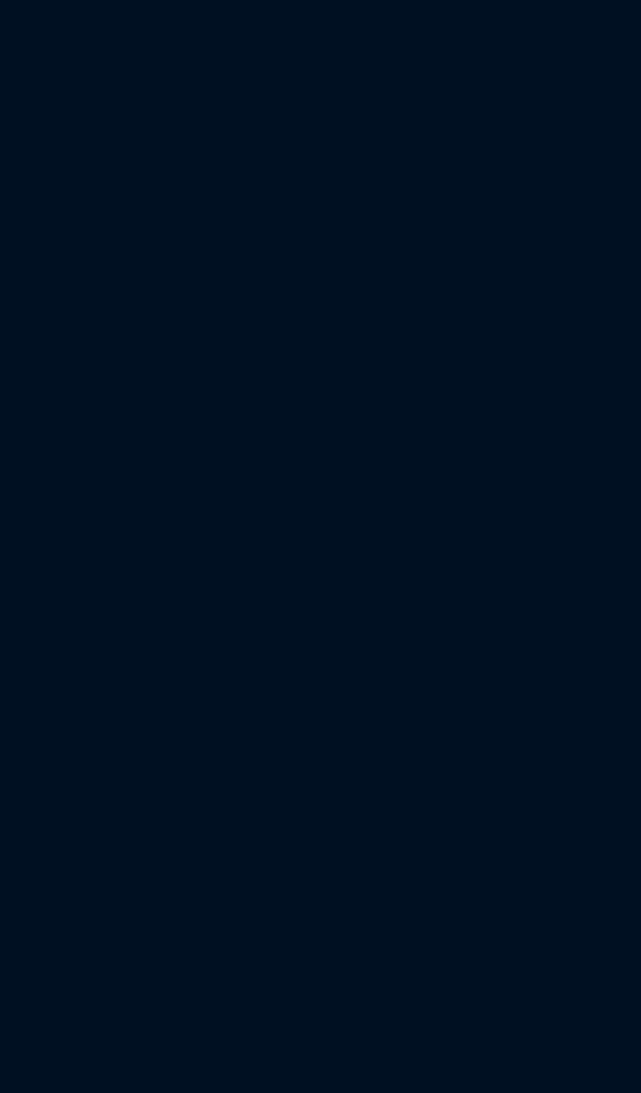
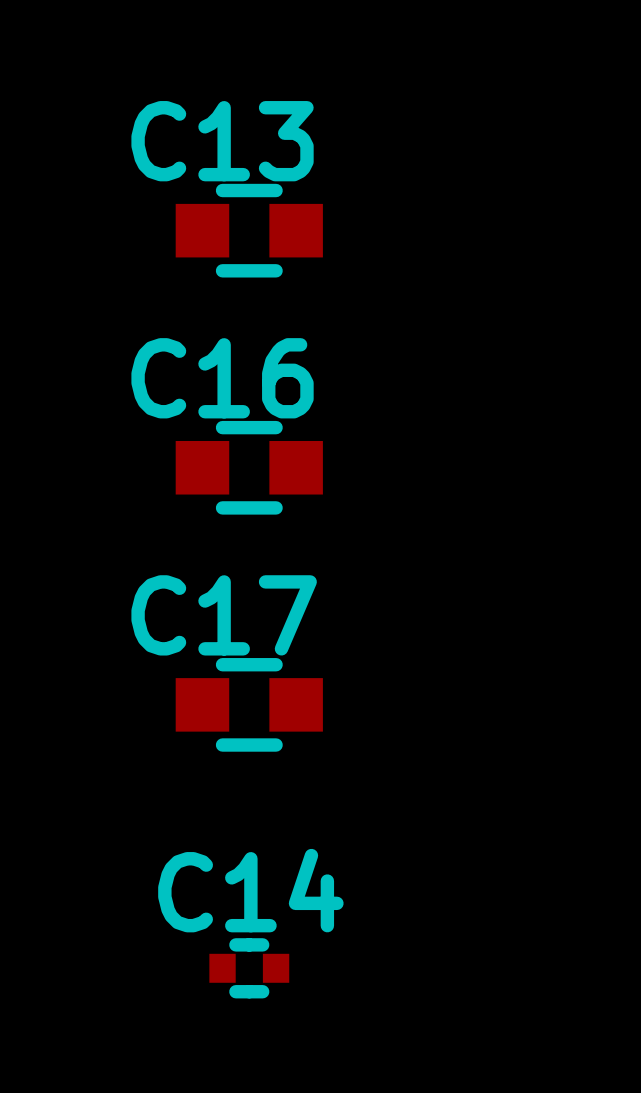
C13: none -> (249, 230)
C16: none -> (249, 467)
C17: none -> (249, 704)
C14: none -> (249, 968)

